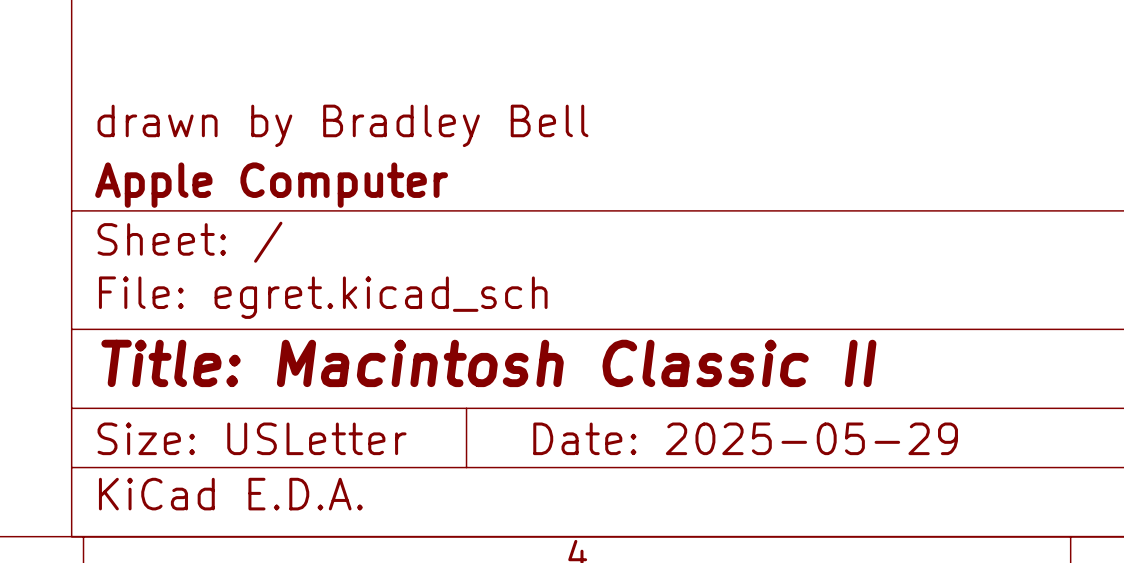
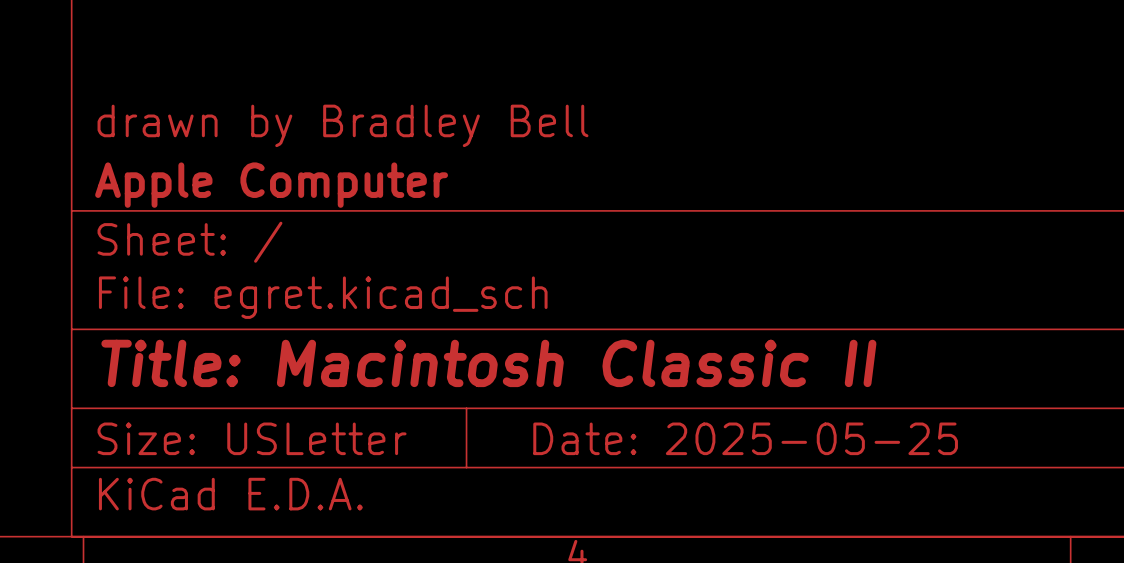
title block: Date: 2025-05-29 (745, 438) -> Date: 2025-05-25 (745, 438)

